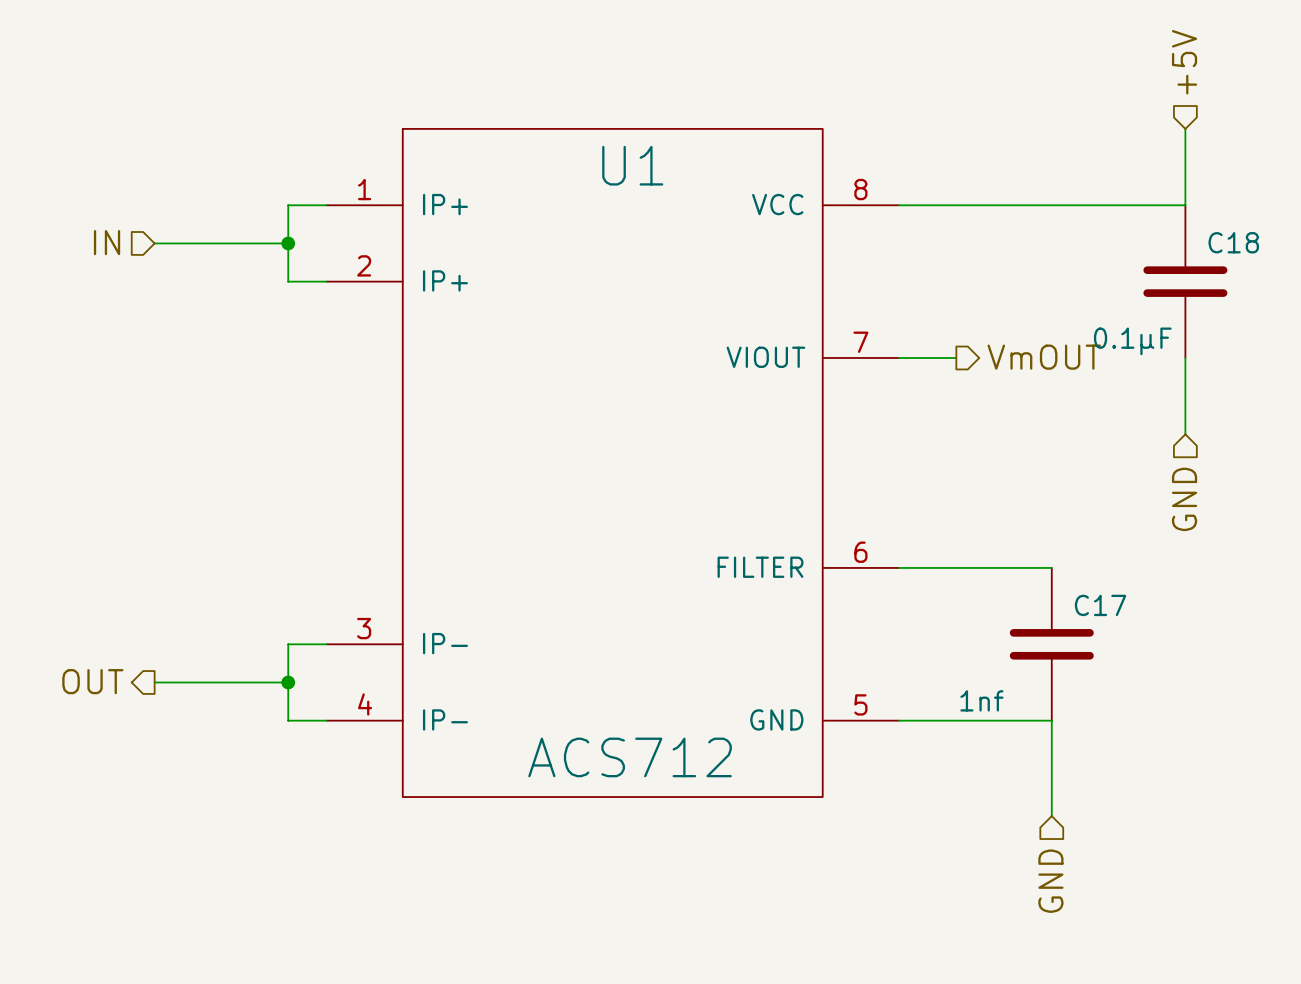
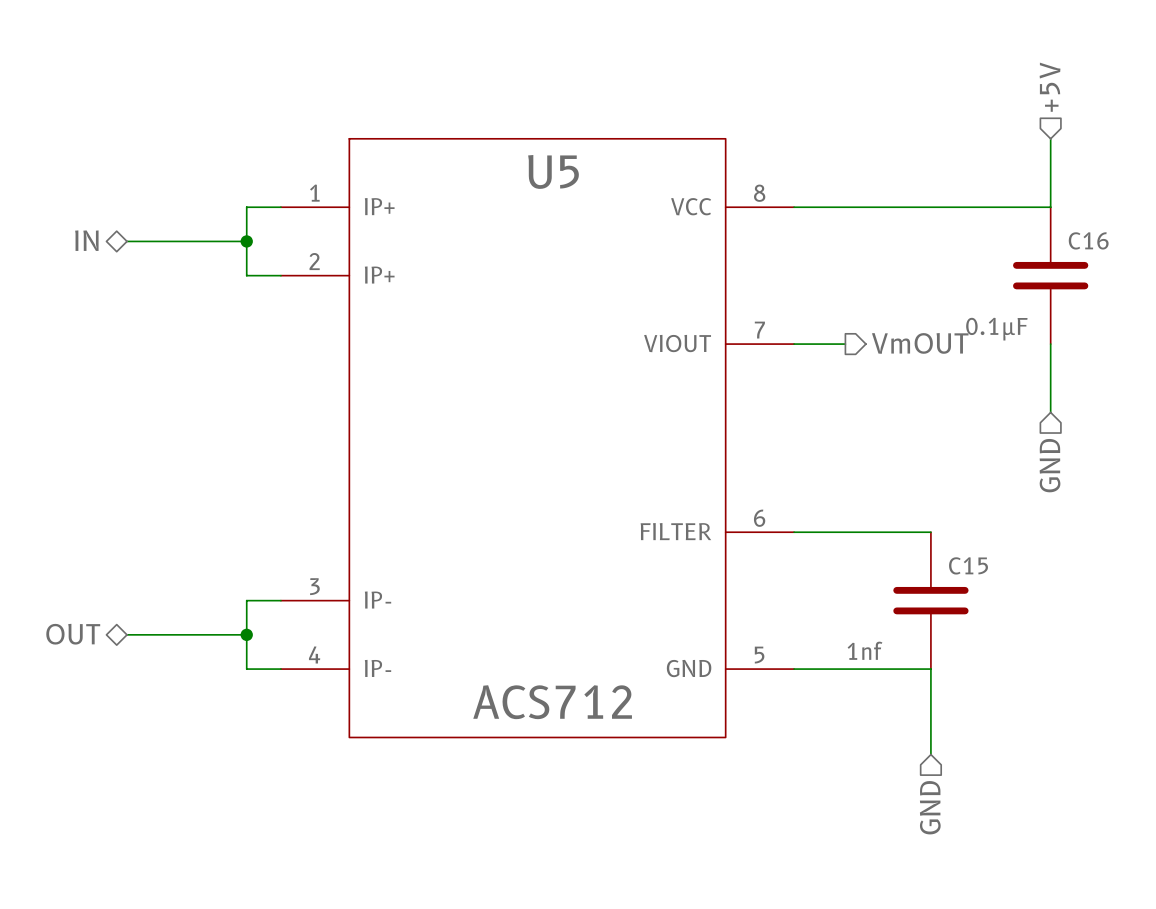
U1 name: U1 (632, 165) -> U5 (553, 171)
hierarchical label shape: input (107, 242) -> bidirectional (86, 240)
C18 name: C18 (1233, 242) -> C16 (1088, 240)
C17 name: C17 (1100, 605) -> C15 (968, 565)
hierarchical label shape: output (92, 681) -> bidirectional (73, 634)

